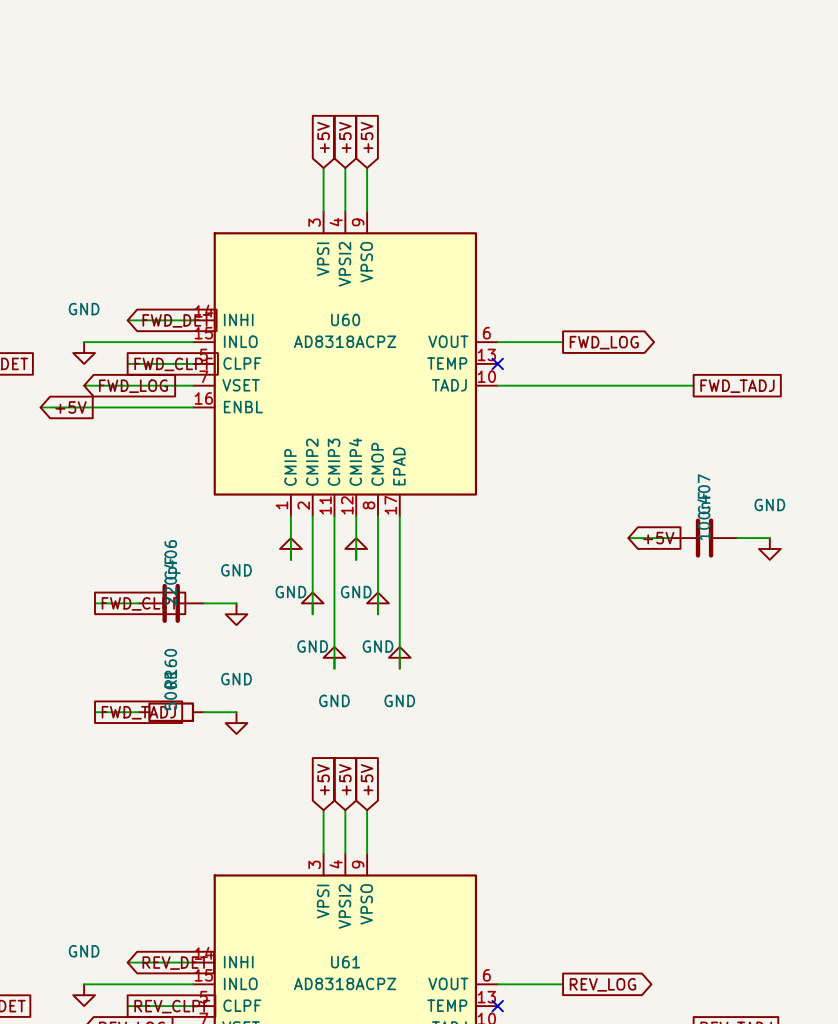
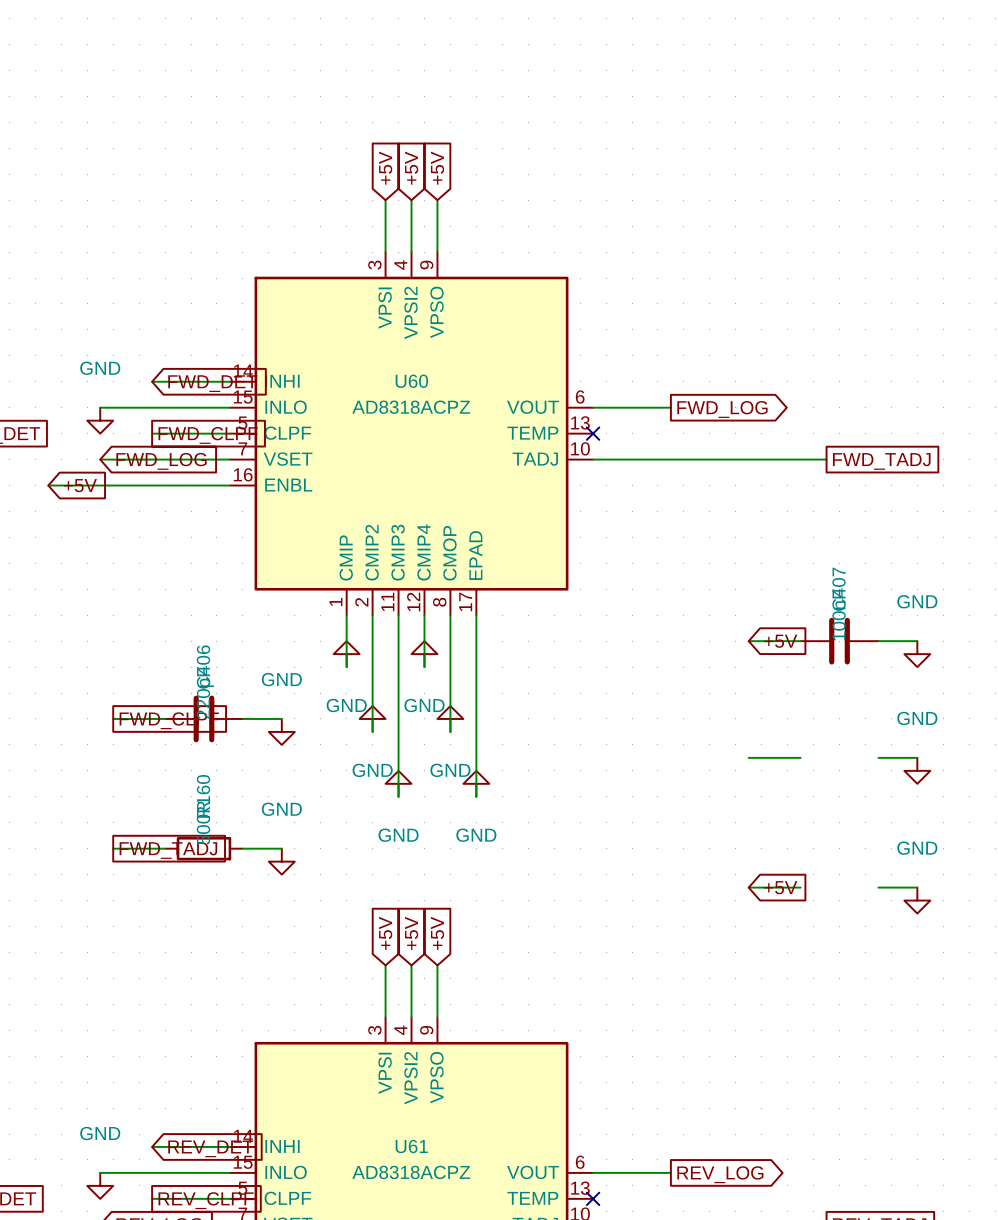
wire: none -> (748, 757) (800, 757)
wire: none -> (878, 757) (917, 757)
power symbol: none -> GND (917, 770)
wire: none -> (748, 887) (800, 887)
global label: none -> +5V (780, 887)
wire: none -> (878, 887) (917, 887)
power symbol: none -> GND (917, 900)

